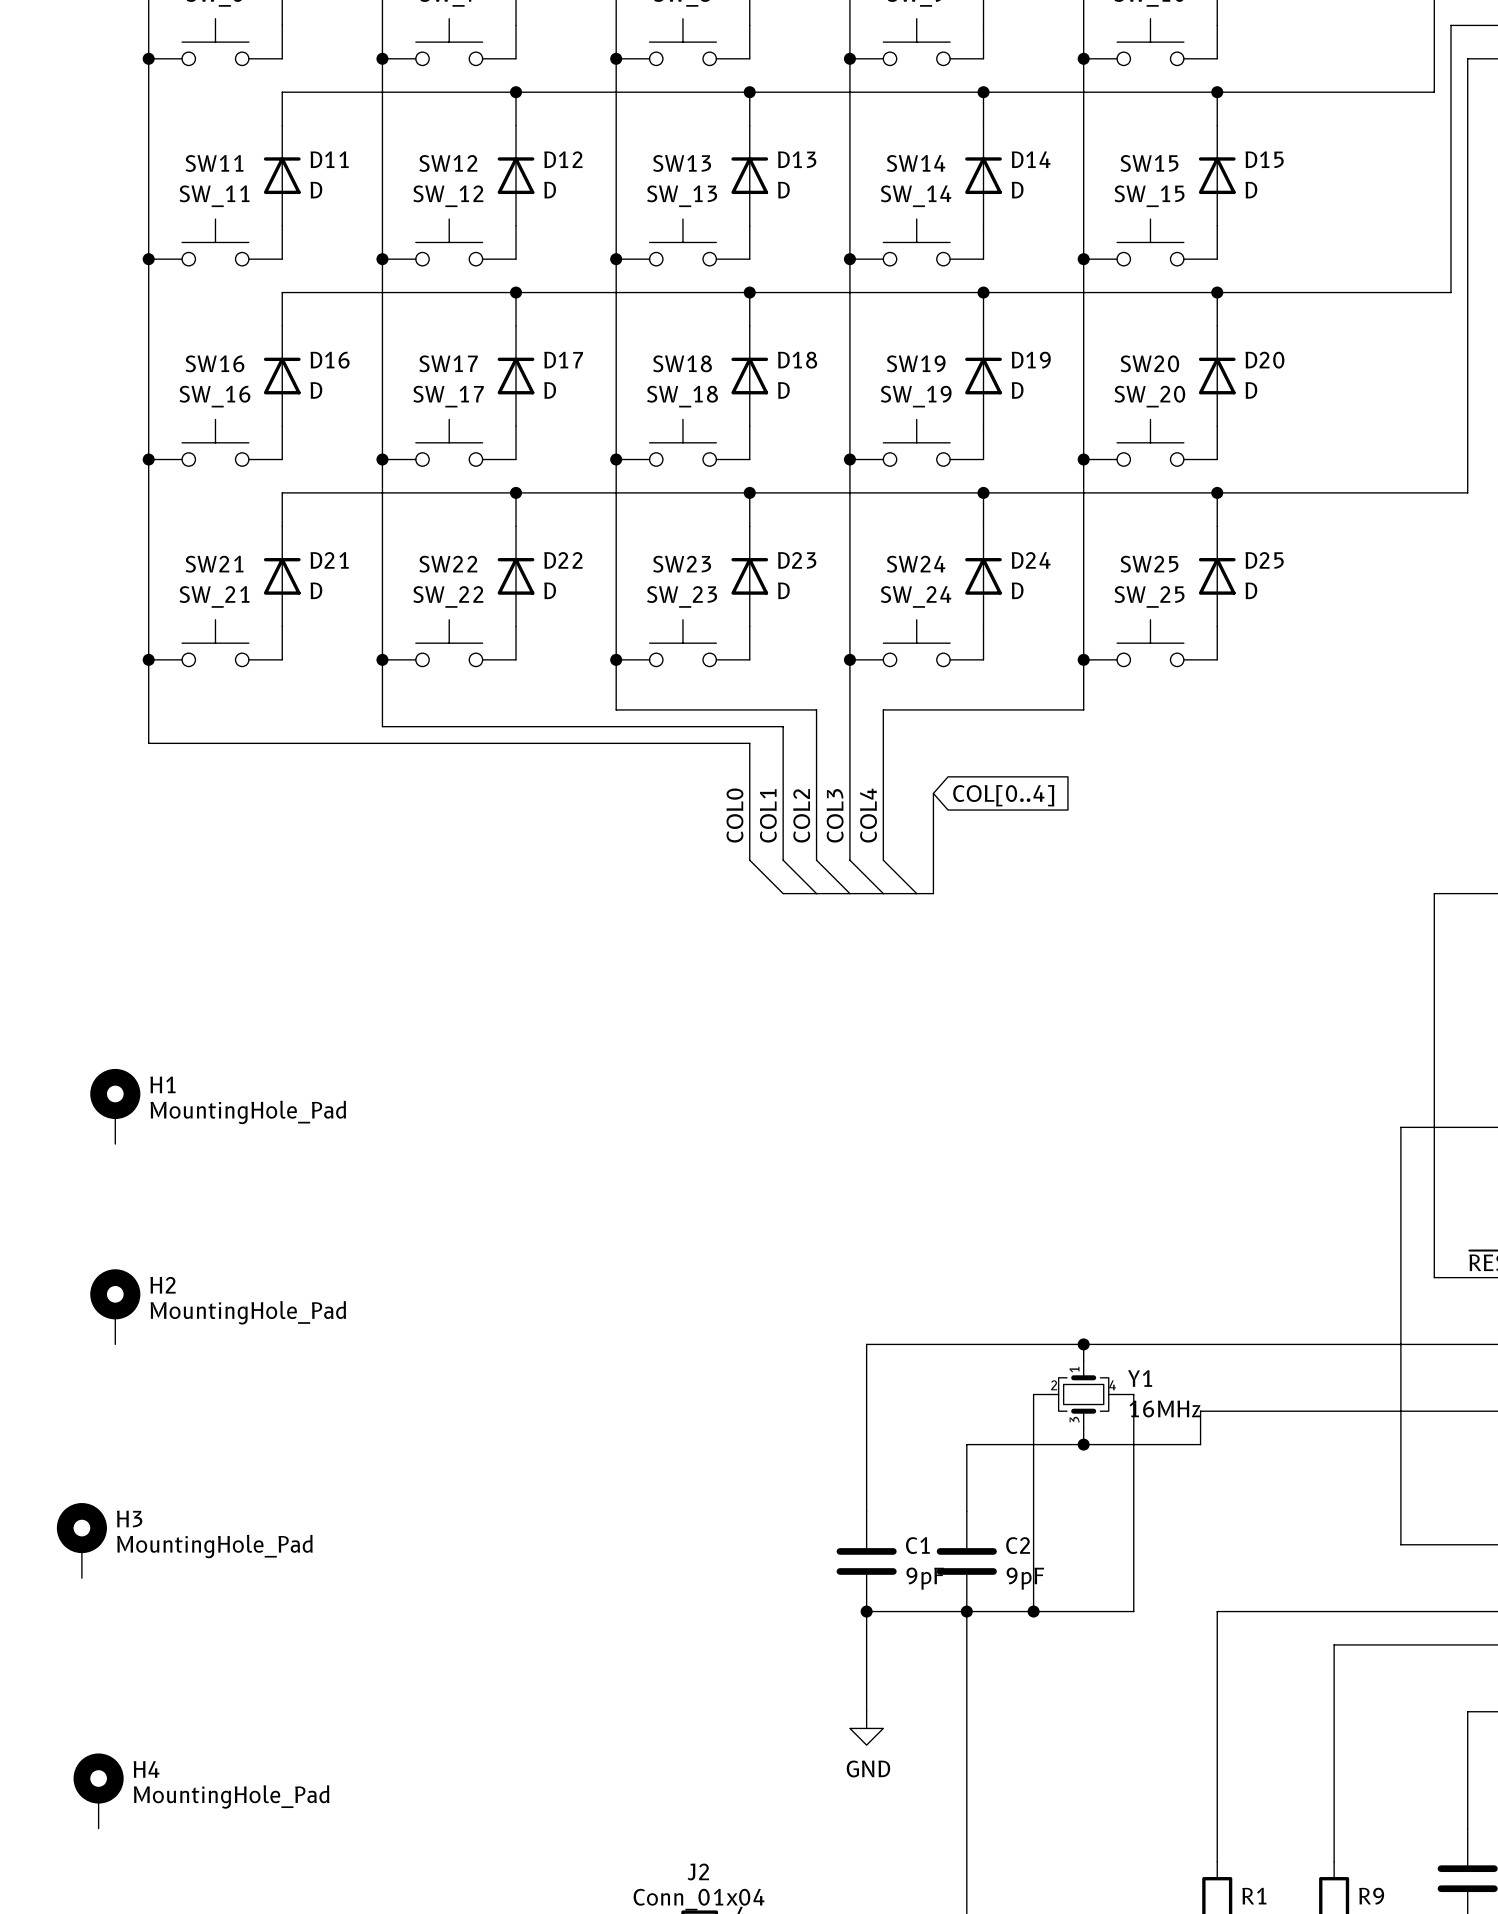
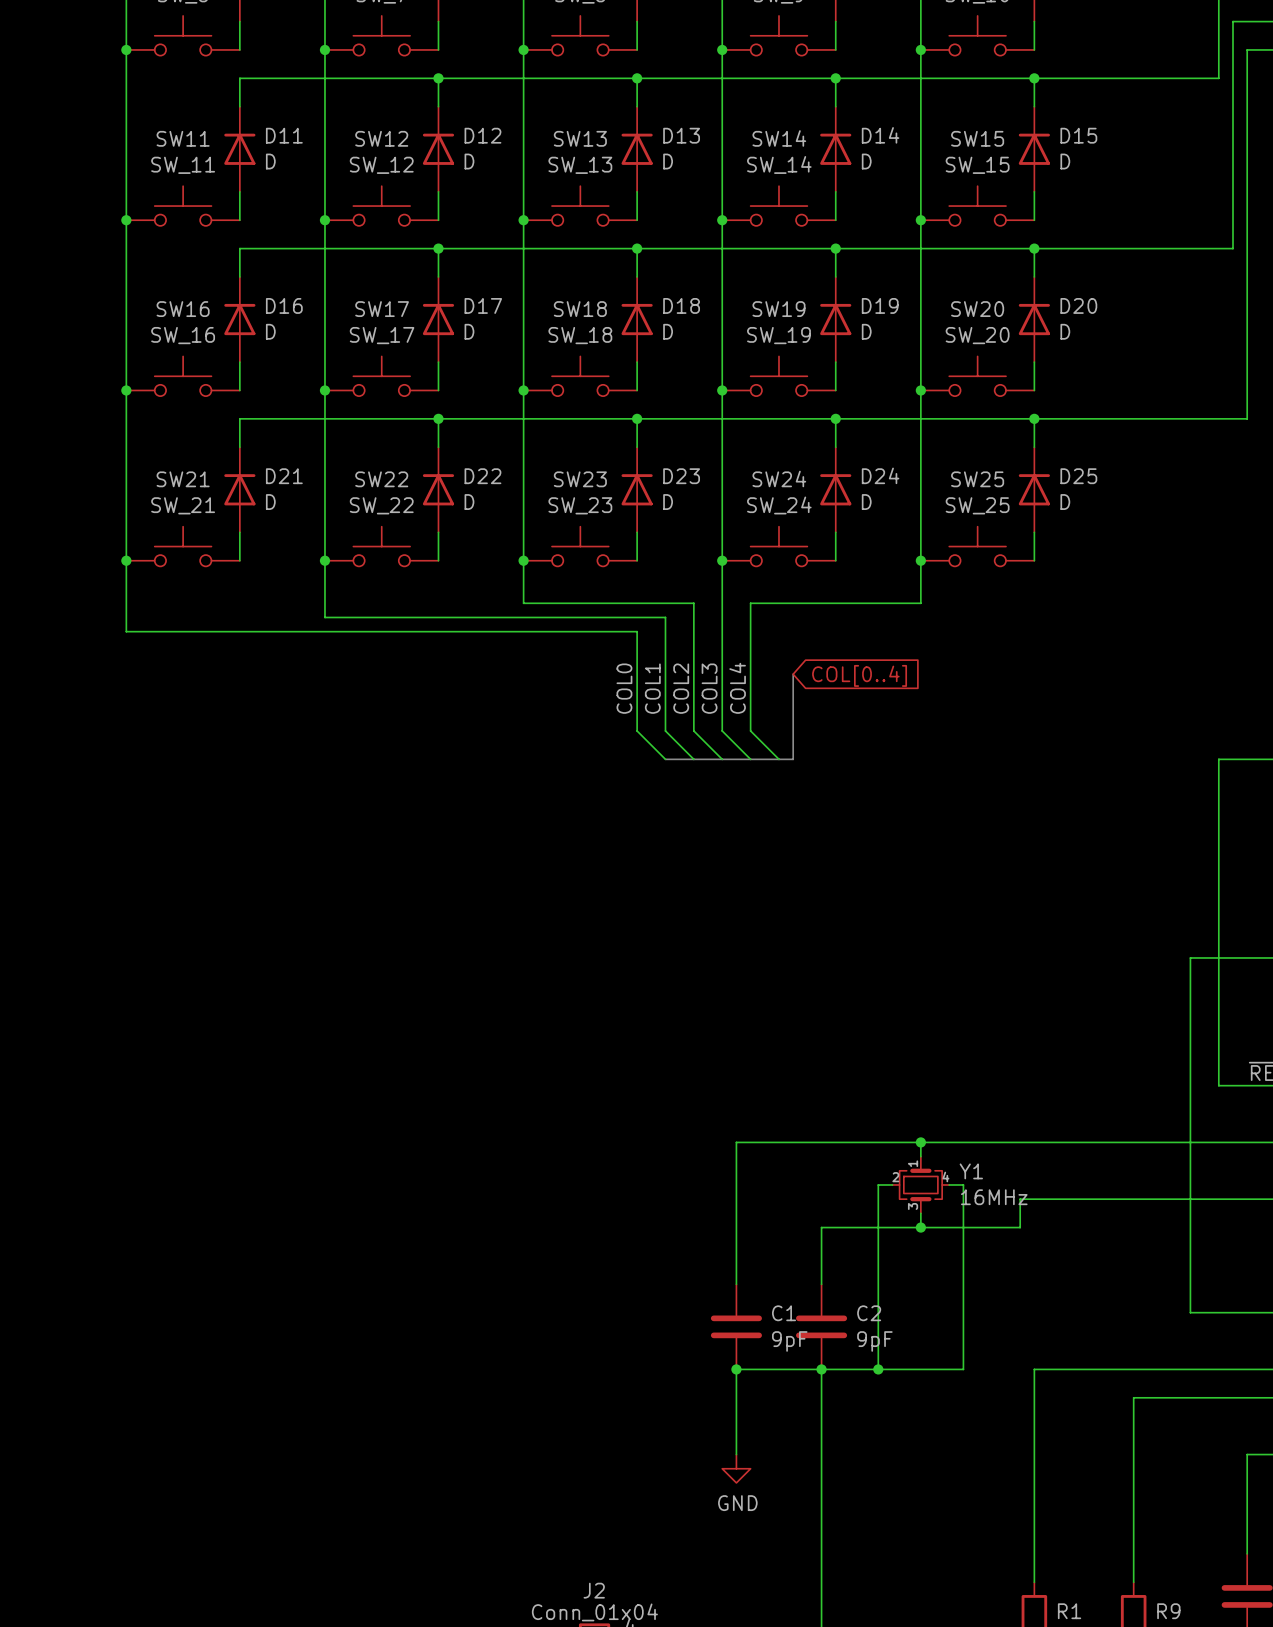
H1: MountingHole_Pad (115, 1106) -> none
H2: MountingHole_Pad (115, 1306) -> none
H3: MountingHole_Pad (81, 1540) -> none
H4: MountingHole_Pad (98, 1791) -> none

